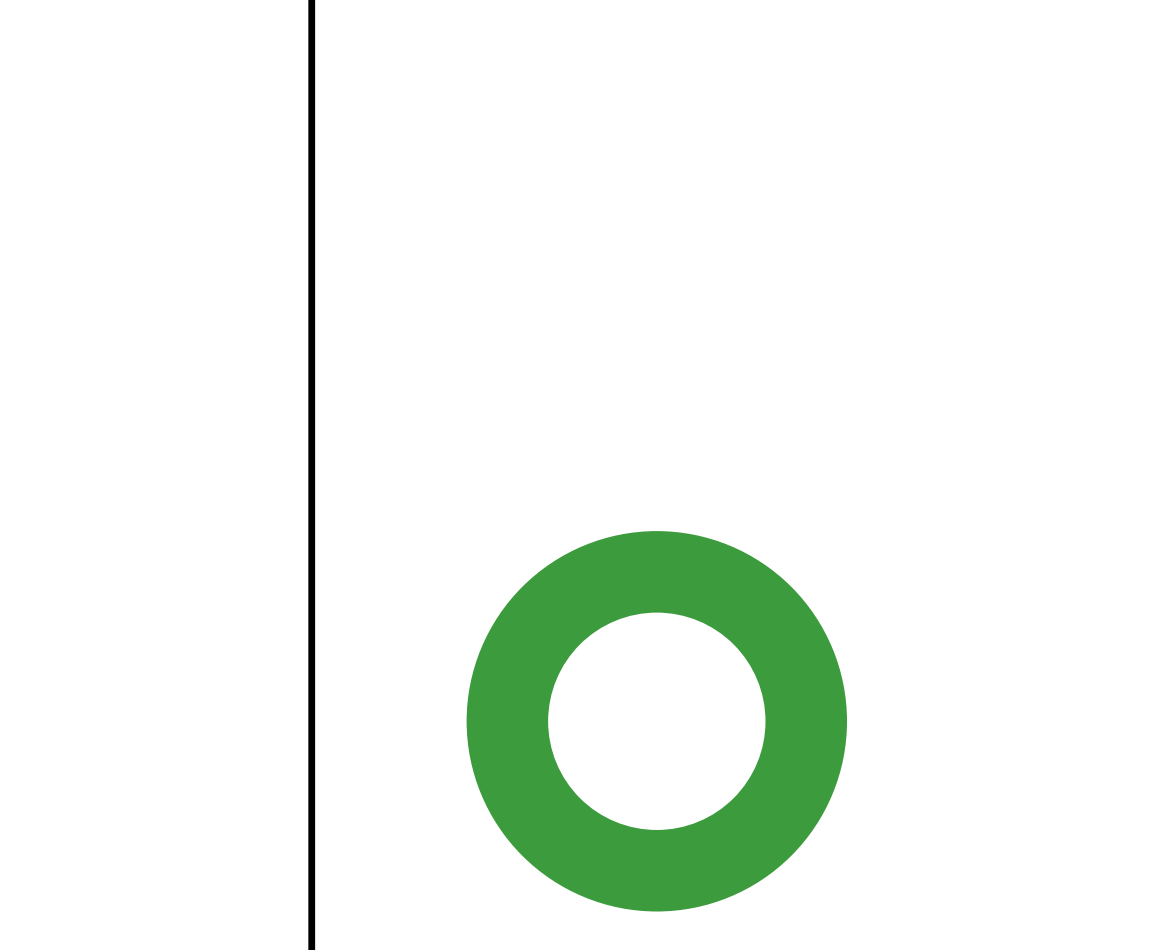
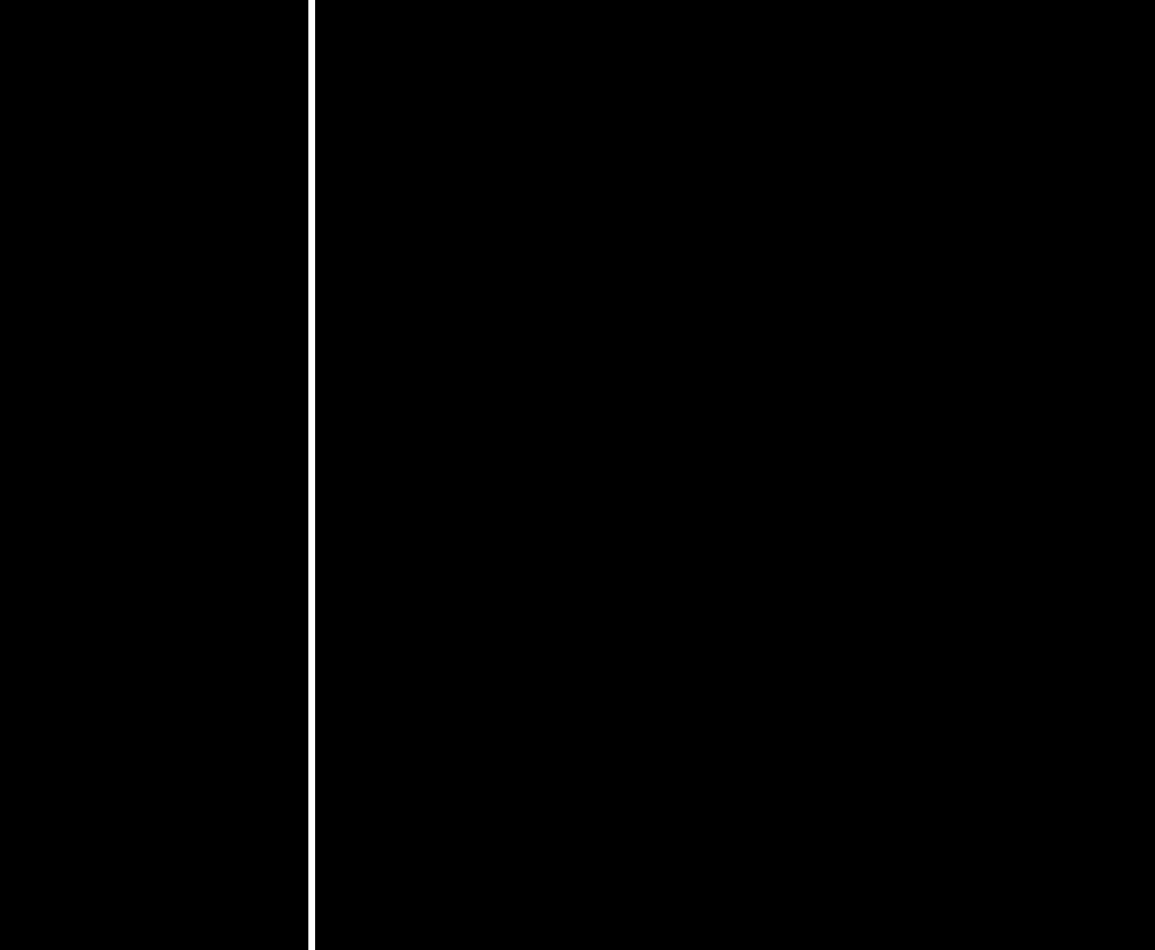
part: (656, 721) -> none

